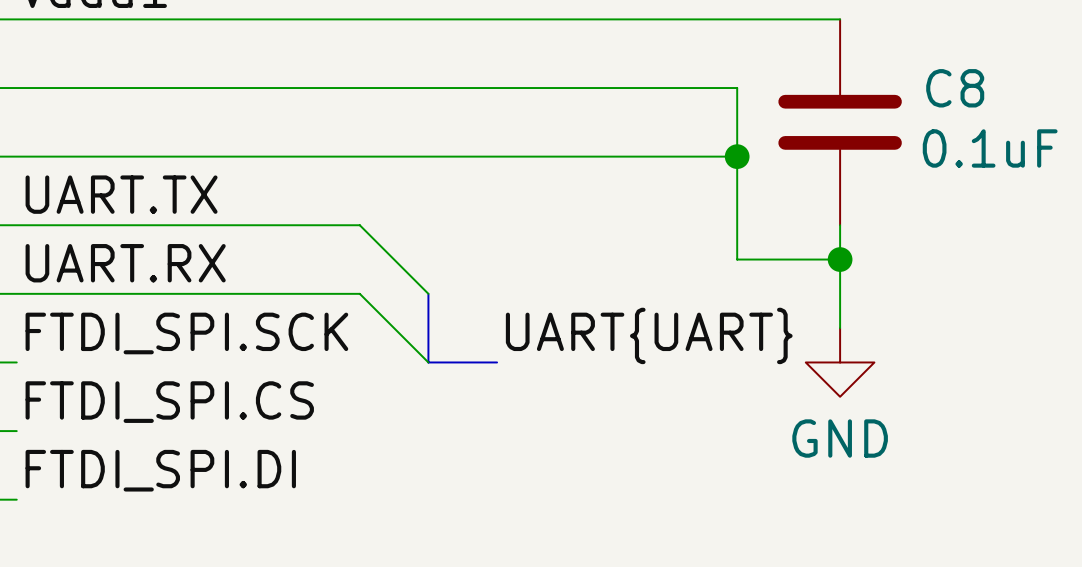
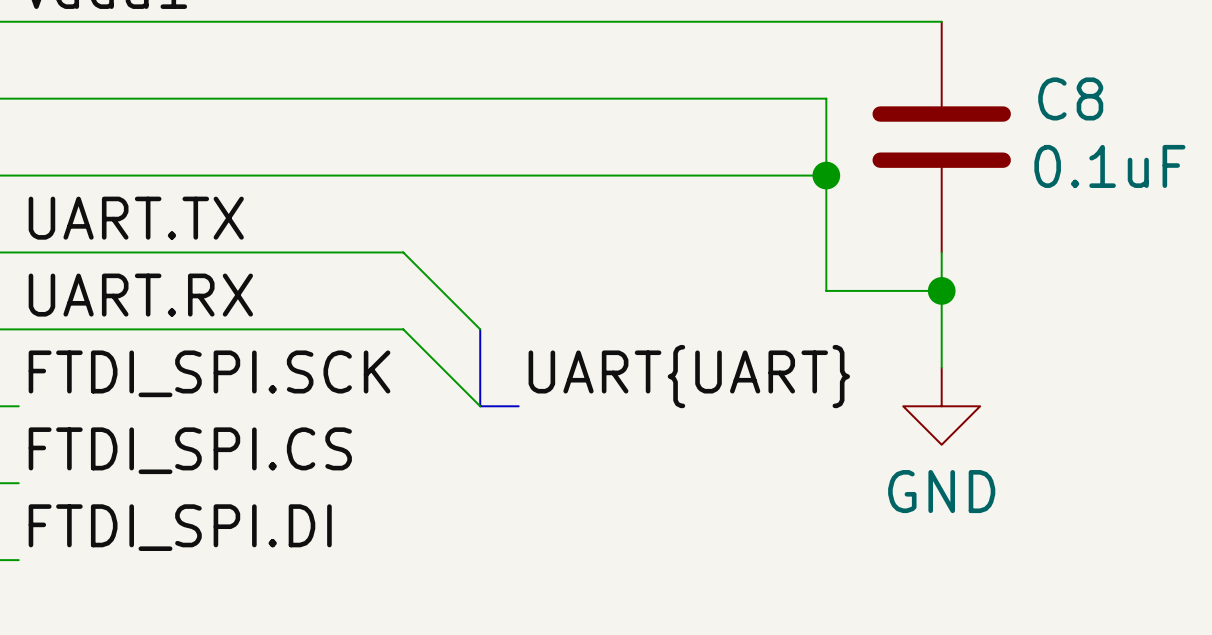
label position: UART{UART} (649, 335) -> UART{UART} (689, 376)
bus: (462, 362) (497, 362) -> none

